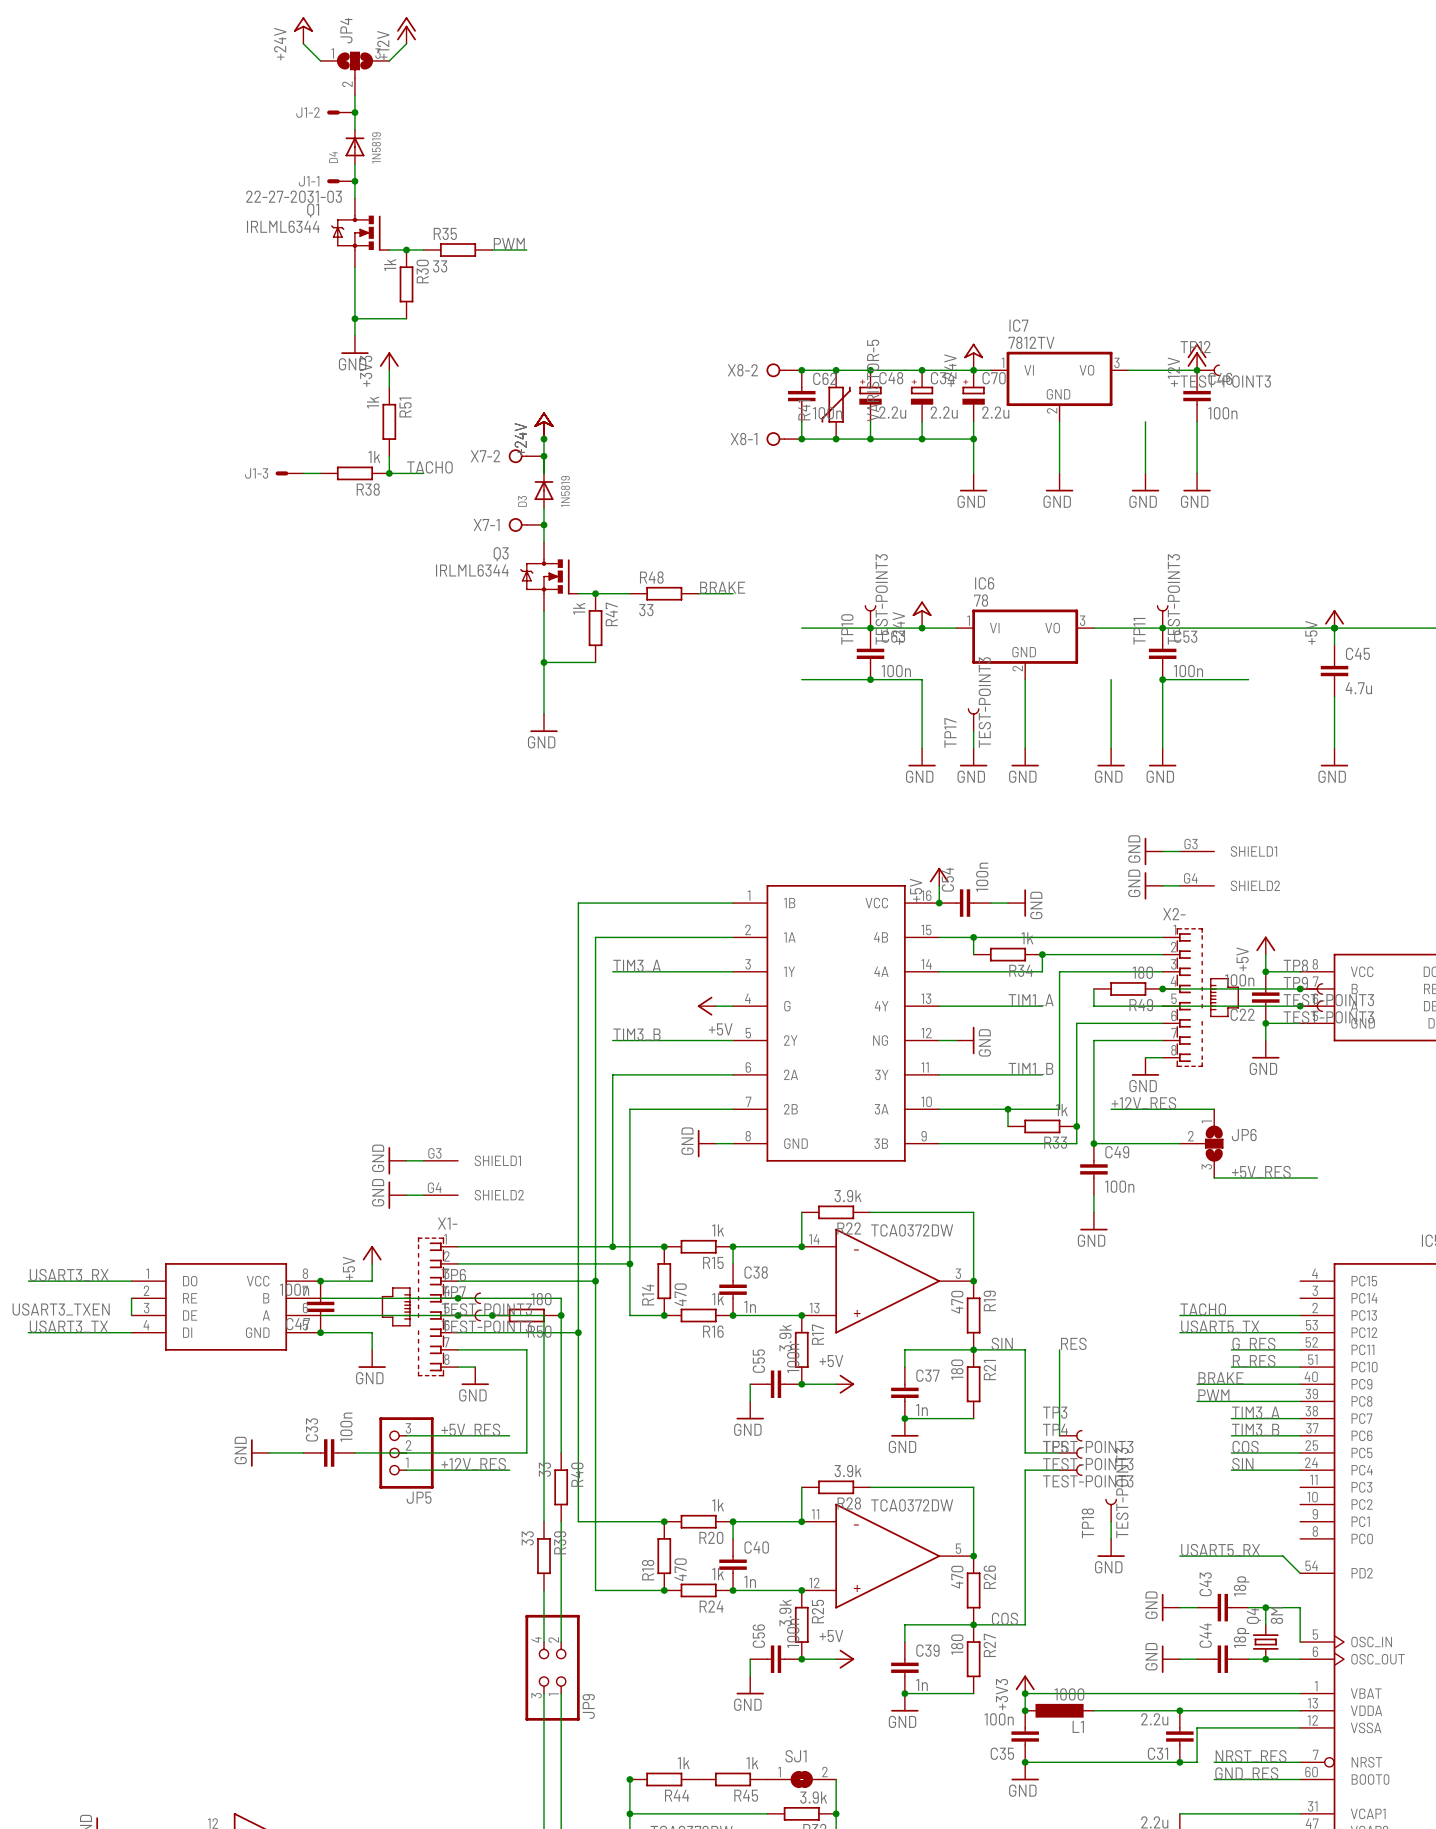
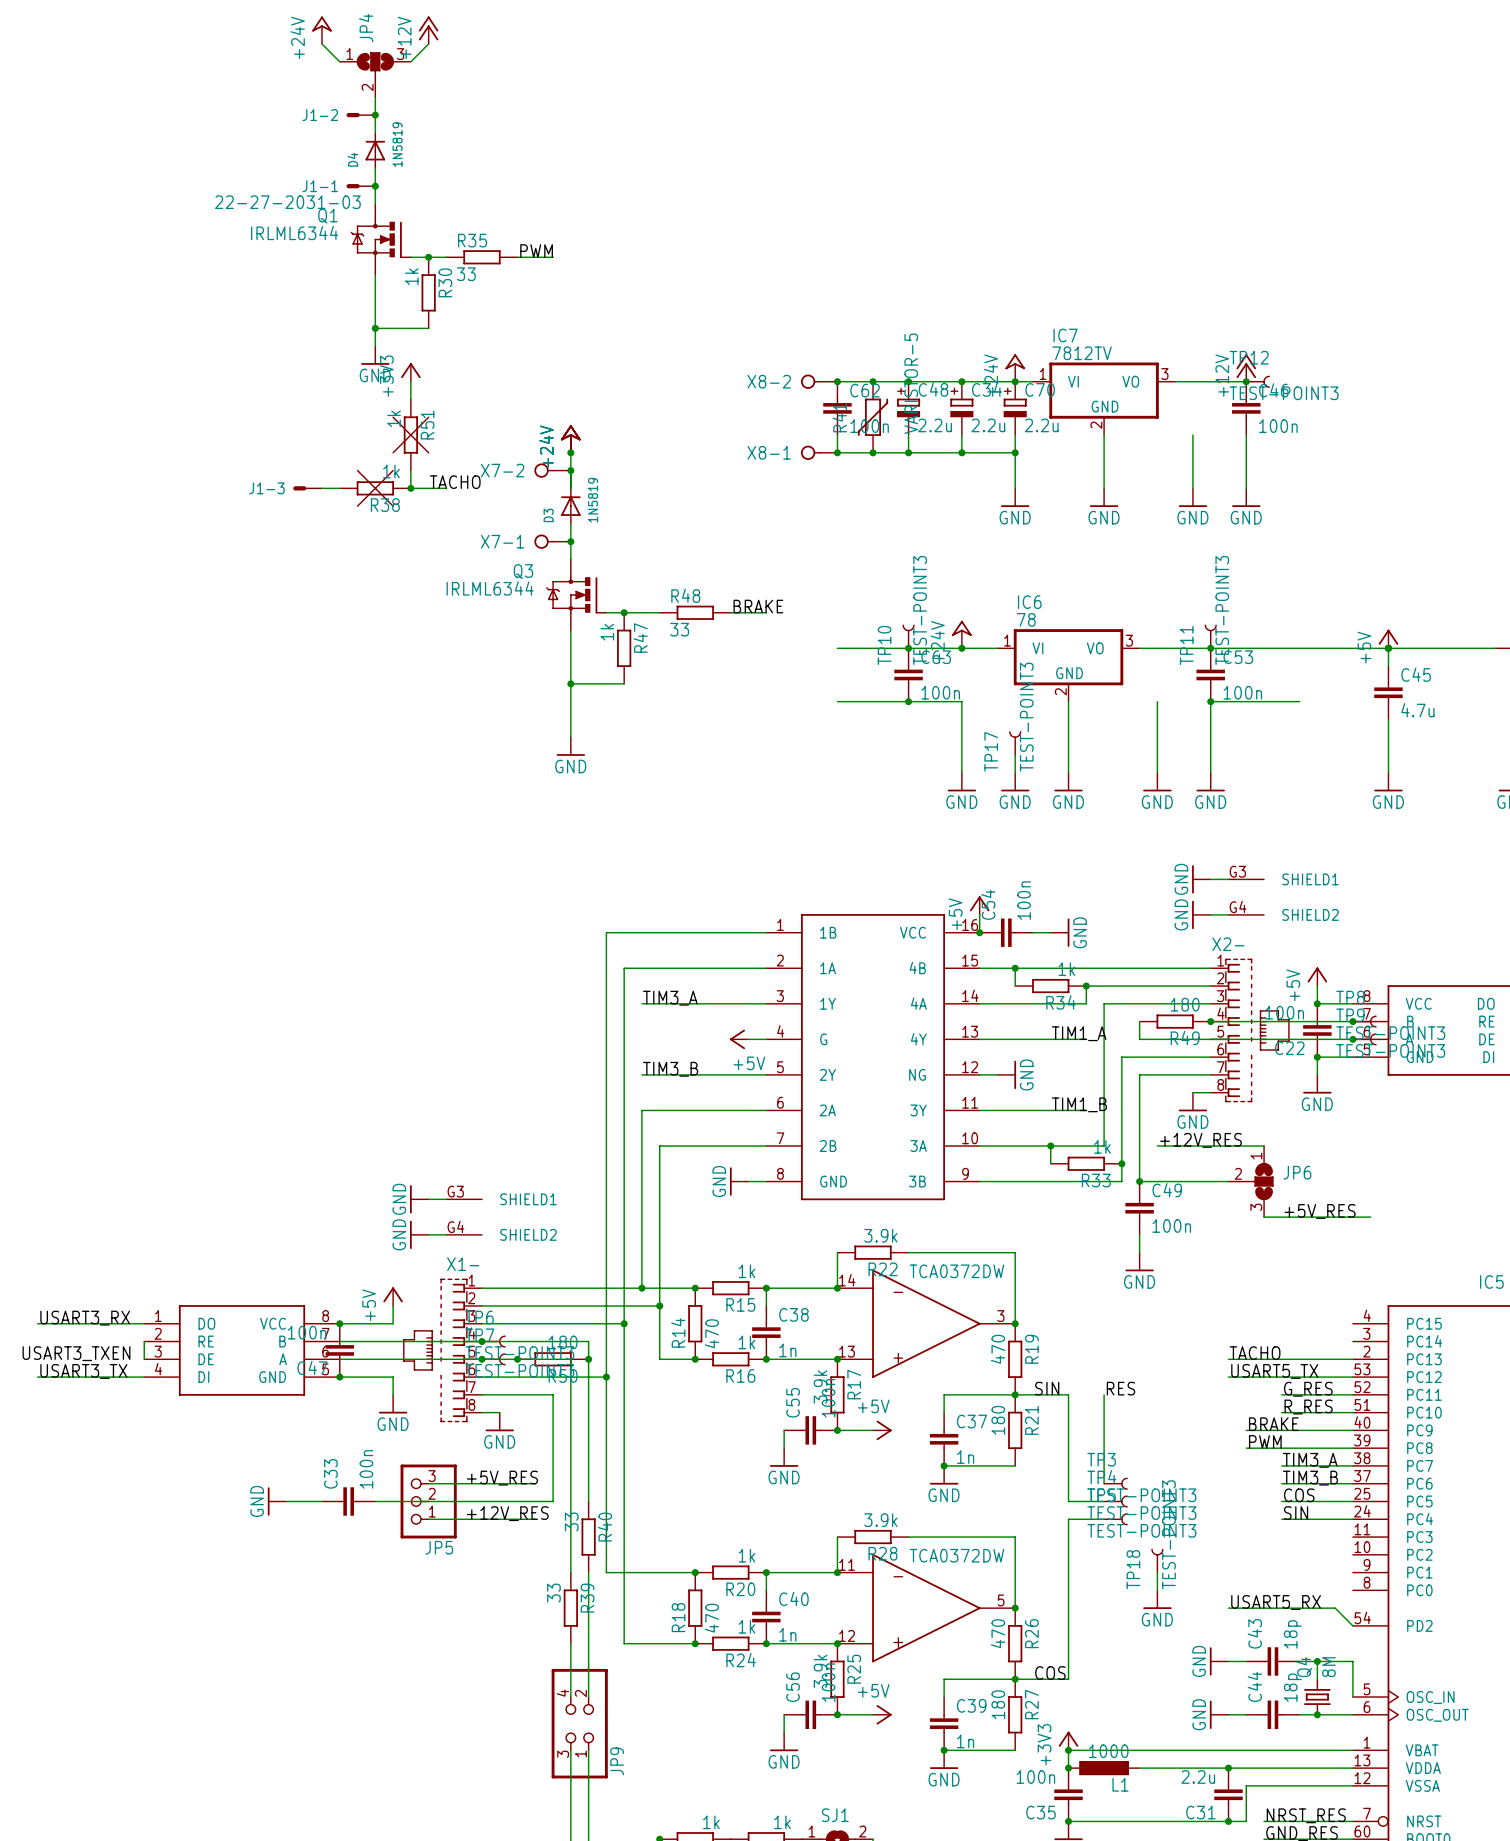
line: none -> (393, 417) (428, 452)
line: none -> (428, 417) (393, 452)
line: none -> (357, 470) (393, 506)
line: none -> (393, 470) (357, 506)

